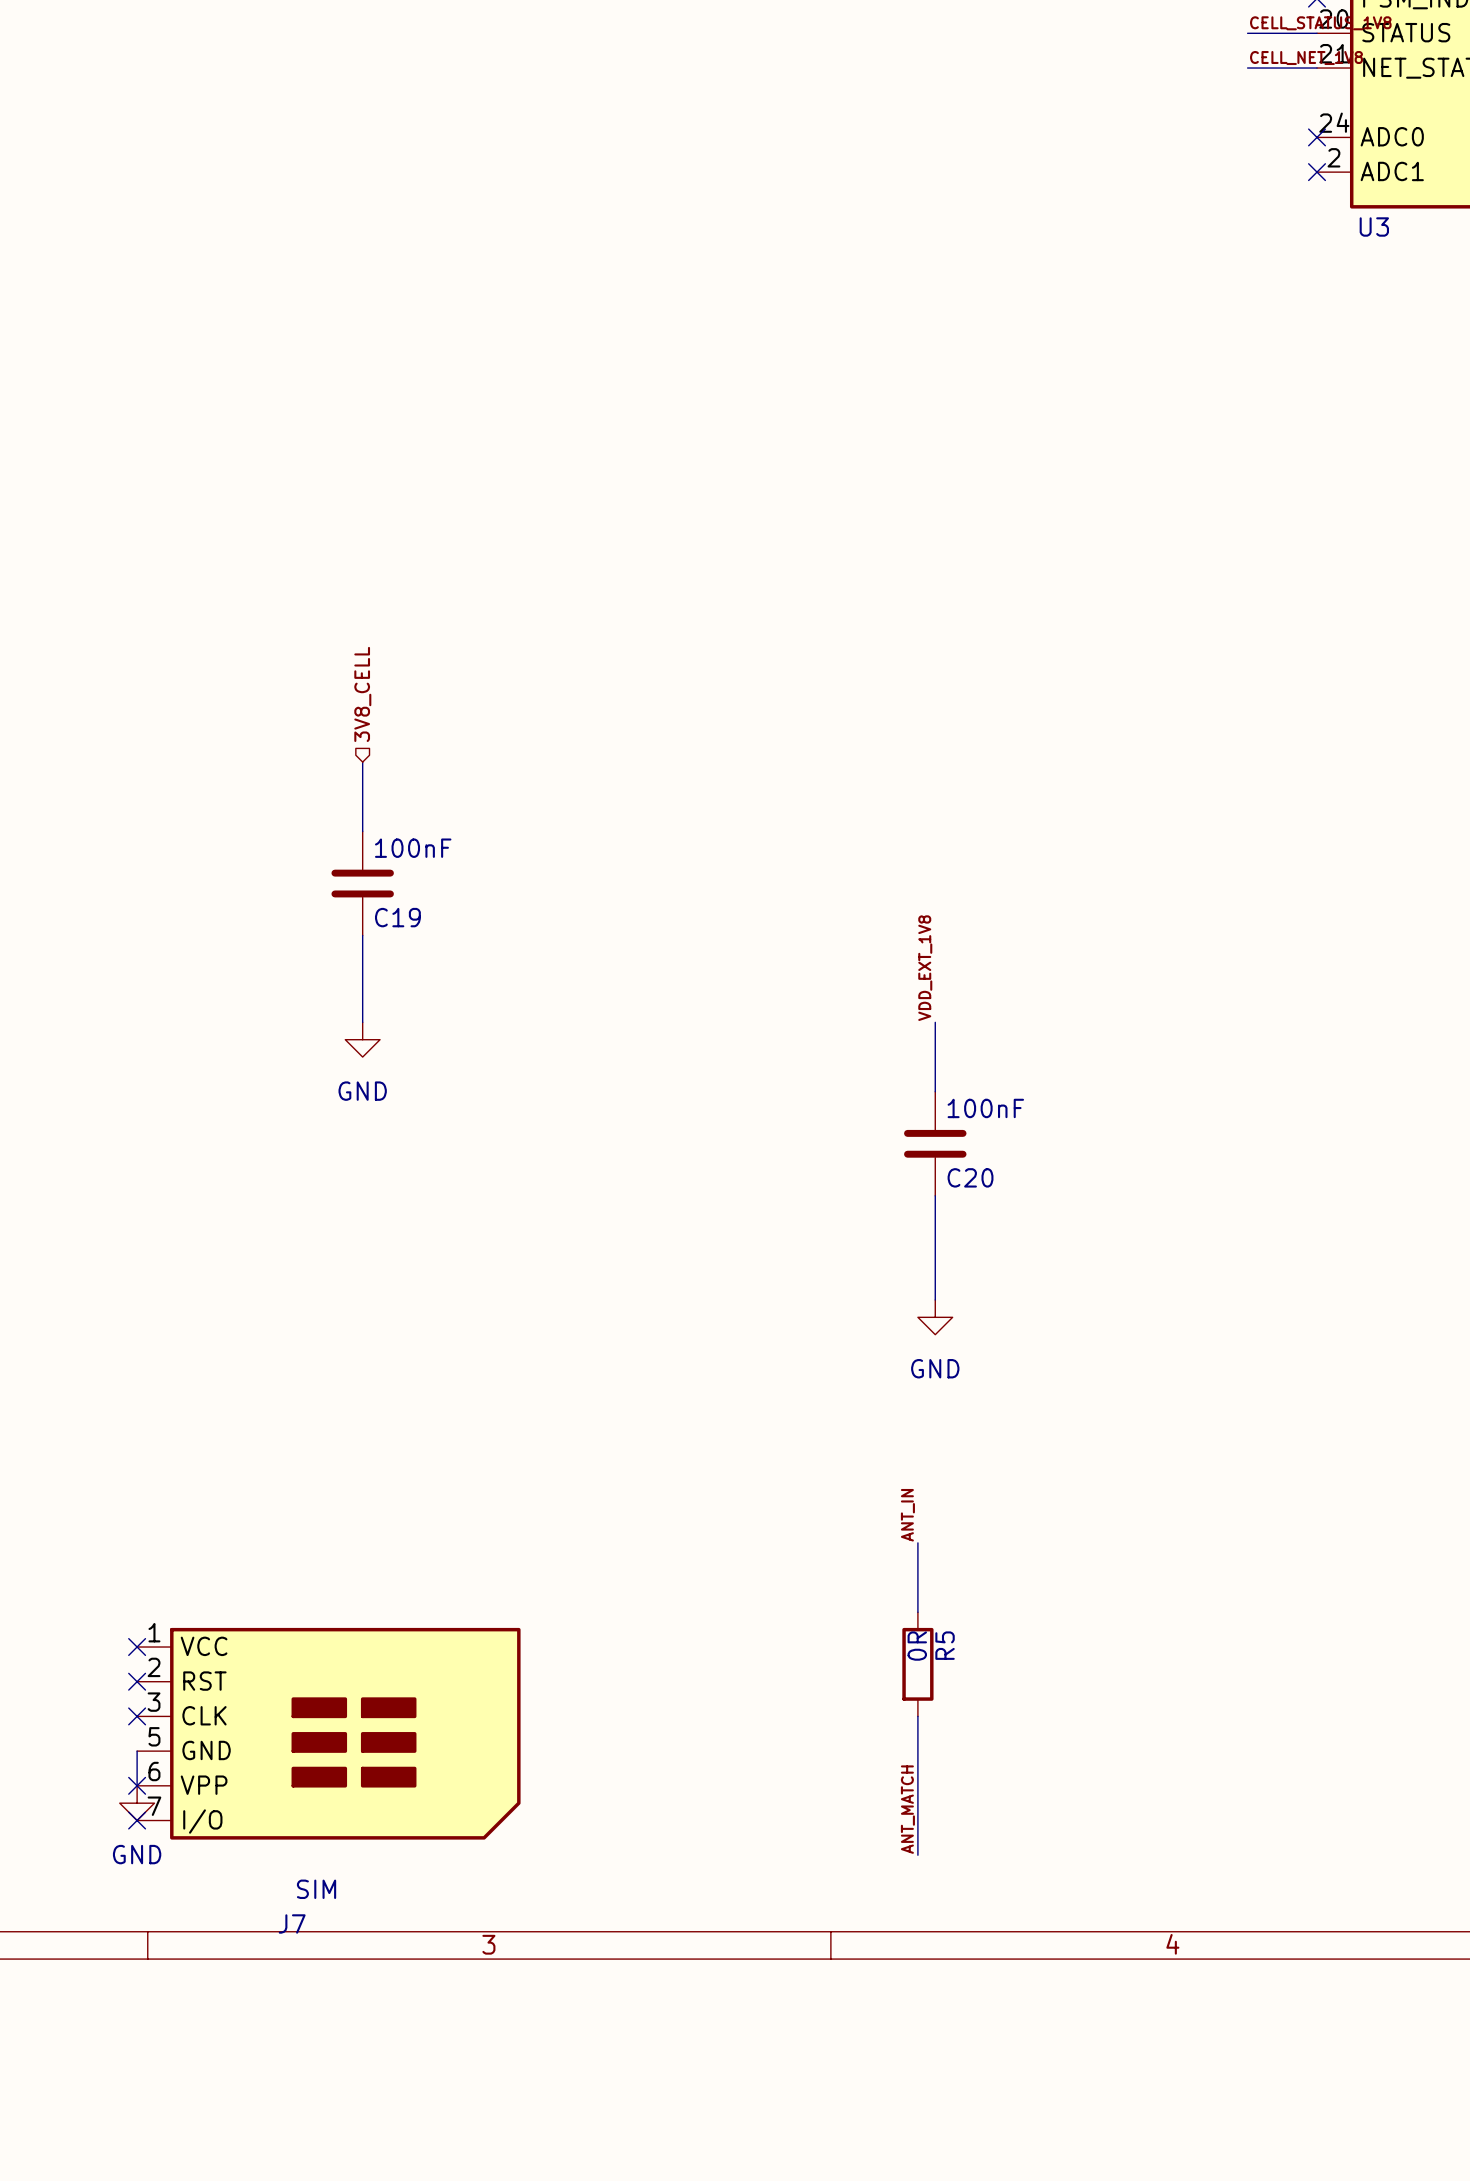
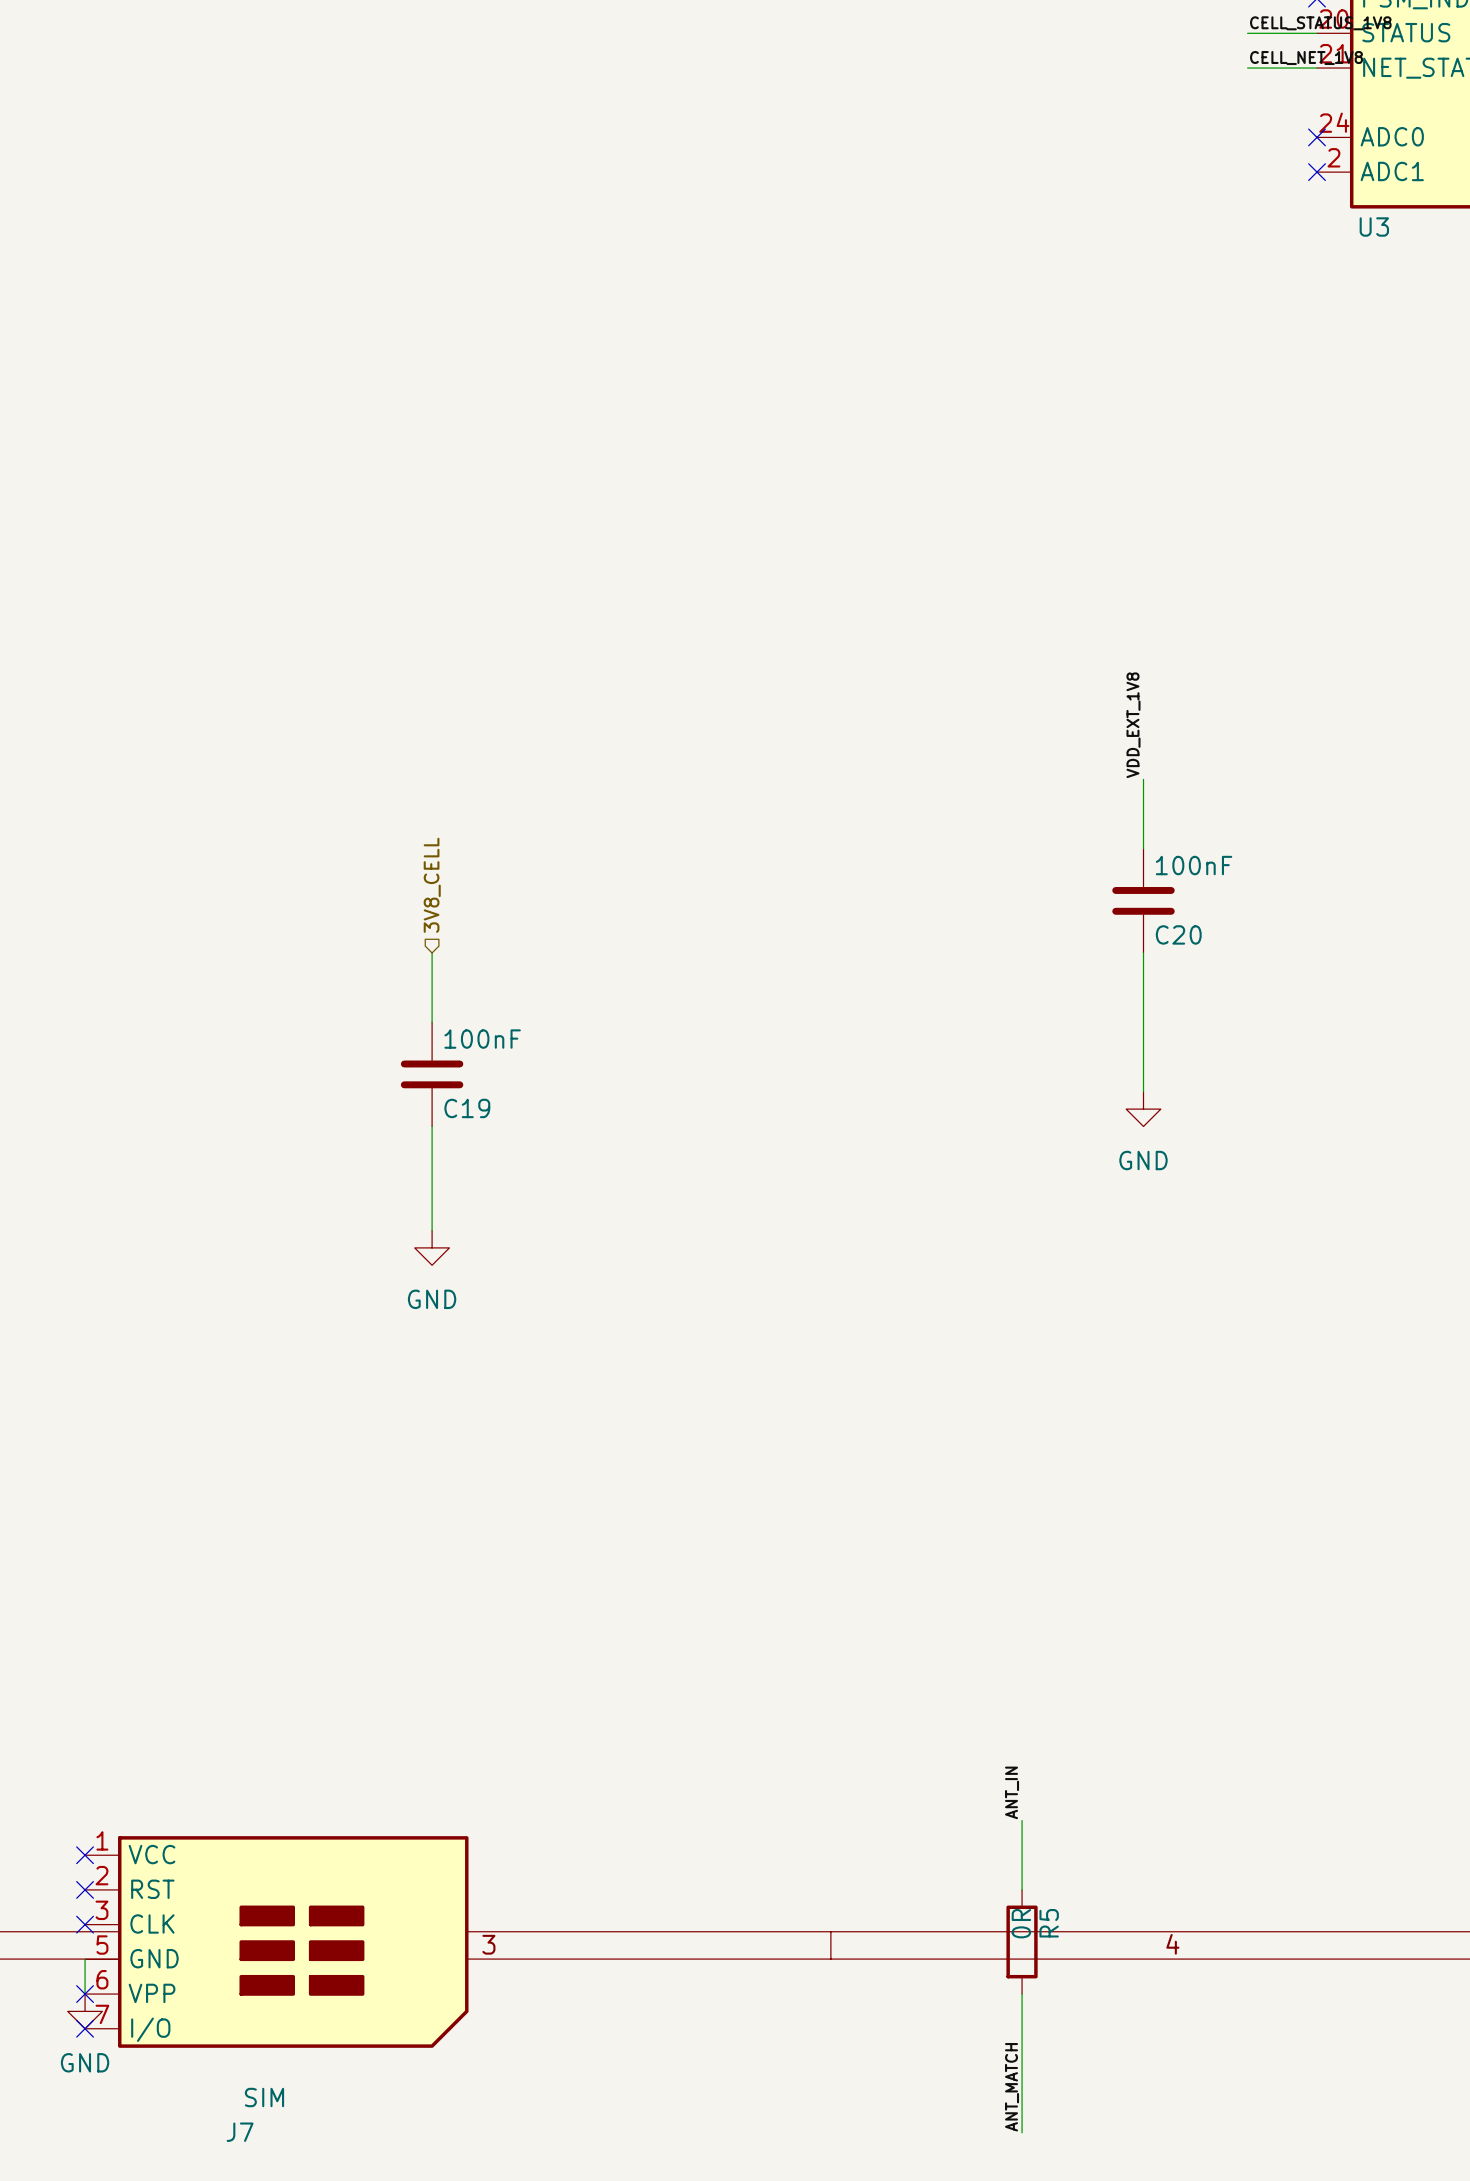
hierarchical label position: 3V8_CELL (362, 694) -> 3V8_CELL (432, 885)
wire: (362, 762) (362, 831) -> (432, 952) (432, 1022)
C19 position: (362, 883) -> (432, 1074)
wire: (362, 935) (362, 1022) -> none
wire: none -> (1143, 952) (1143, 1091)
label position: VDD_EXT_1V8 (925, 968) -> VDD_EXT_1V8 (1133, 725)
wire: (935, 1022) (935, 1091) -> (1143, 779) (1143, 848)
power symbol position: GND (362, 1039) -> GND (432, 1247)
power symbol: none -> GND (1143, 1109)
wire: none -> (432, 1126) (432, 1230)
C20 position: (935, 1143) -> (1143, 900)
wire: (935, 1195) (935, 1299) -> none
power symbol: GND (935, 1317) -> none
label position: ANT_IN (907, 1515) -> ANT_IN (1012, 1792)
wire: (917, 1542) (917, 1612) -> (1022, 1820) (1022, 1889)
no-connect mark: (137, 1647) -> none
R5 position: (917, 1664) -> (1022, 1941)
no-connect mark: (137, 1681) -> none
no-connect mark: (137, 1716) -> none
wire: (917, 1716) (917, 1855) -> (1022, 1994) (1022, 2132)
J7 position: (328, 1733) -> (276, 1941)
wire: (137, 1751) (137, 1785) -> (85, 1959) (85, 1994)
no-connect mark: (137, 1785) -> none
power symbol position: GND (137, 1803) -> GND (85, 2011)
label position: ANT_MATCH (907, 1809) -> ANT_MATCH (1012, 2087)
no-connect mark: (137, 1820) -> none
no-connect mark: none -> (85, 1855)
no-connect mark: none -> (85, 1889)
no-connect mark: none -> (85, 1924)
no-connect mark: none -> (85, 1994)
no-connect mark: none -> (85, 2028)

